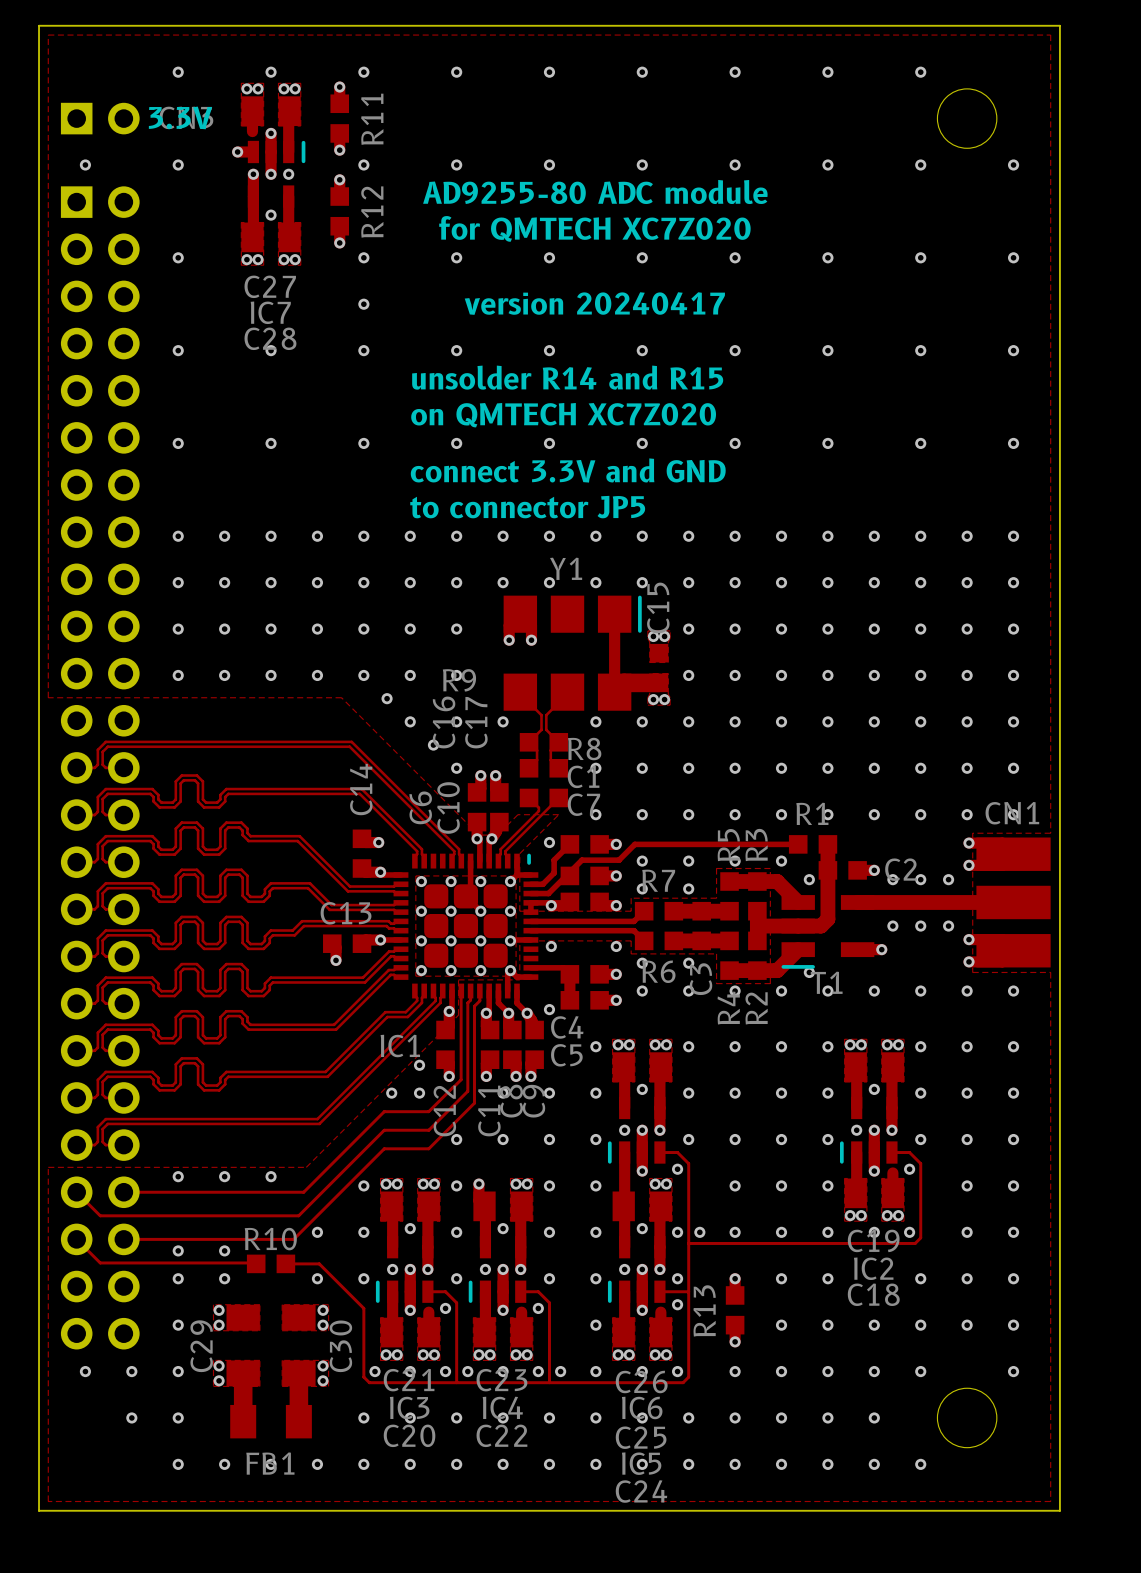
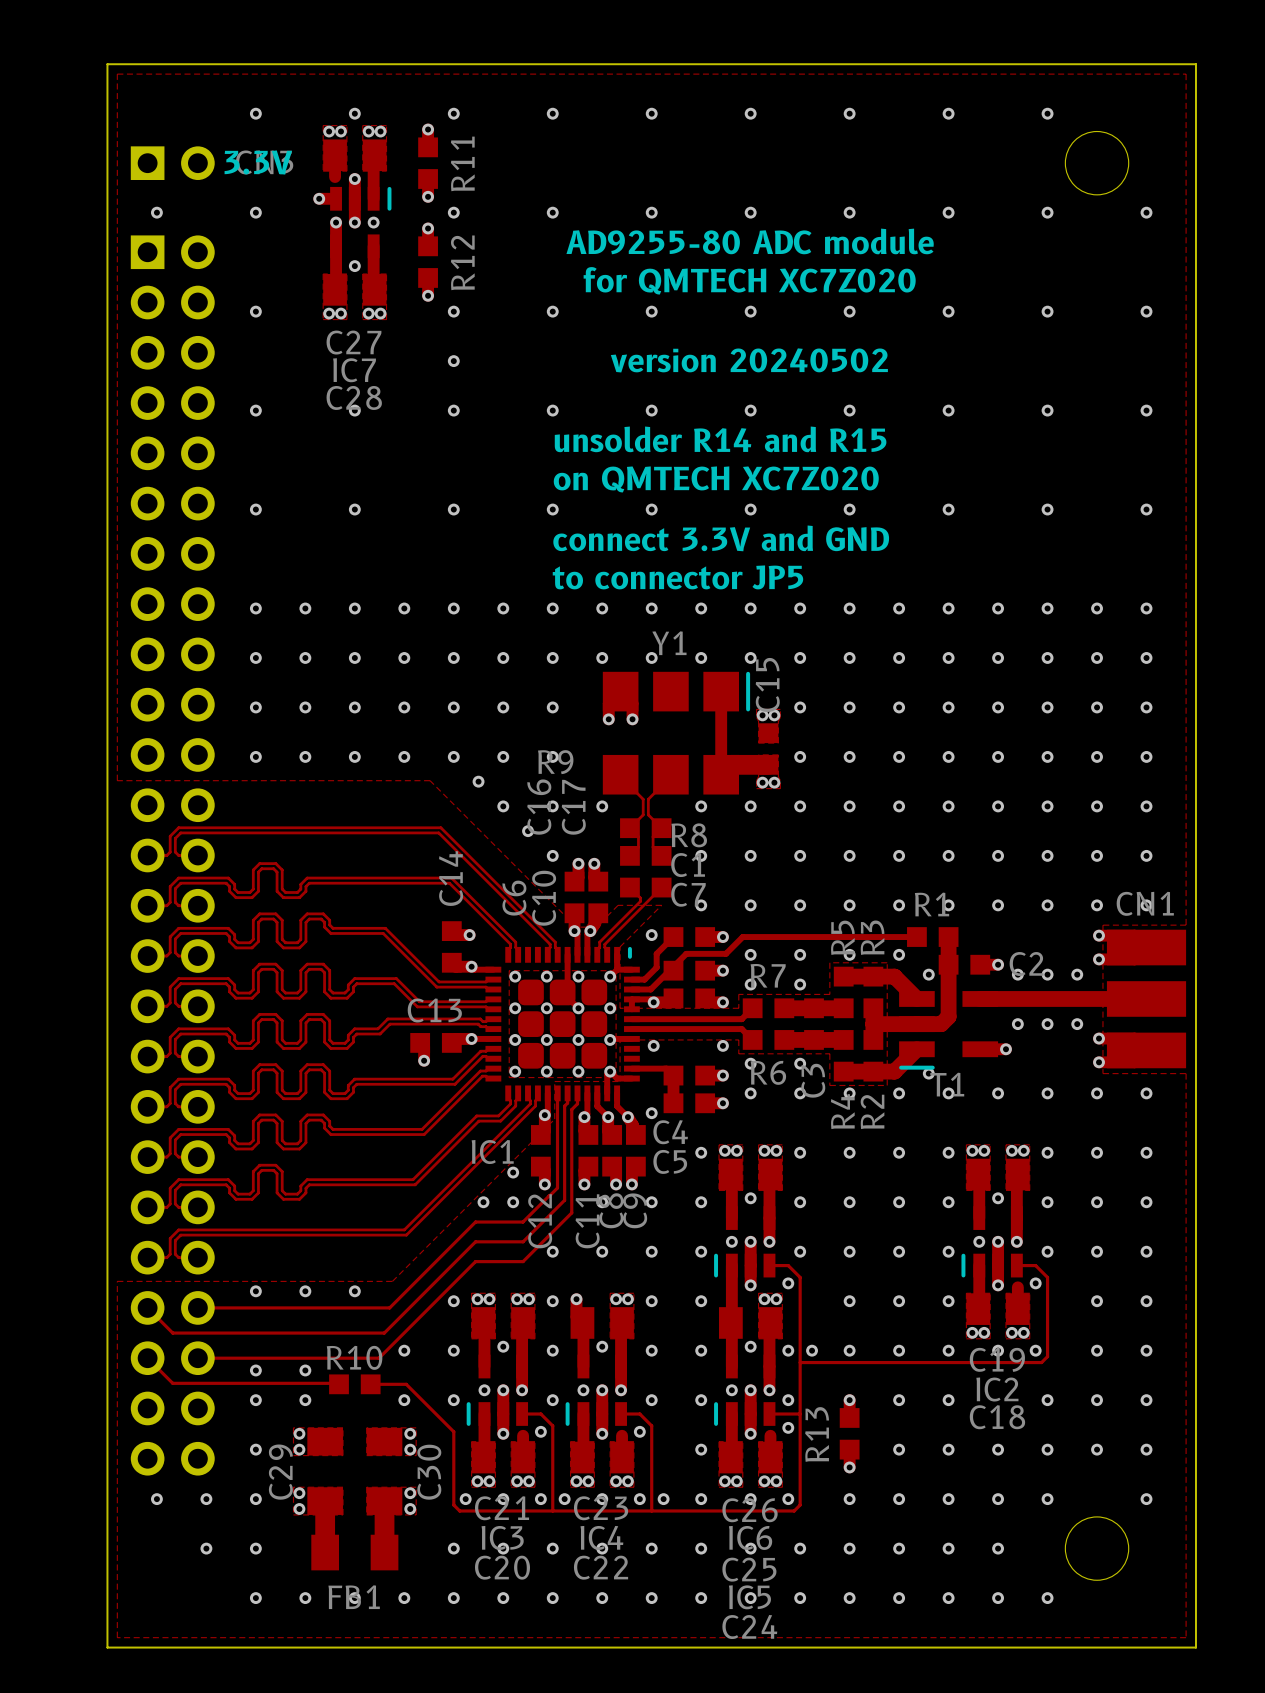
text position: AD9255-80 ADC module (595, 191) -> AD9255-80 ADC module (750, 241)
text position: for QMTECH XC7Z020 (594, 228) -> for QMTECH XC7Z020 (749, 280)
text: version 20240417 (594, 303) -> version 20240502 (749, 360)
text position: unsolder R14 and R15 (567, 377) -> unsolder R14 and R15 (720, 439)
text position: on QMTECH XC7Z020 (563, 415) -> on QMTECH XC7Z020 (716, 479)
text position: connect 3.3V and GND (568, 470) -> connect 3.3V and GND (721, 538)
text position: to connector JP5 (527, 507) -> to connector JP5 (677, 577)

